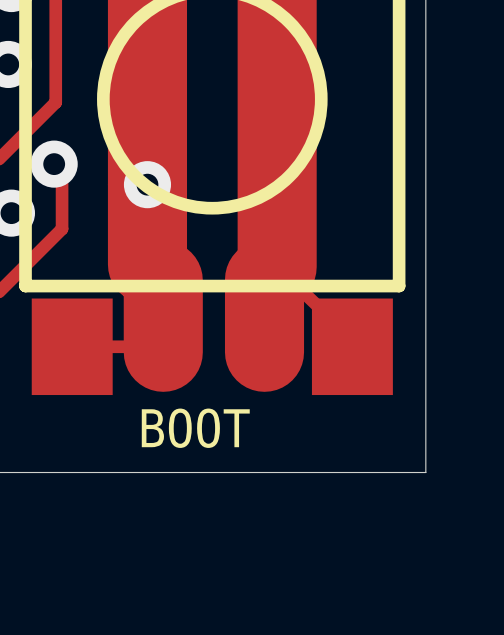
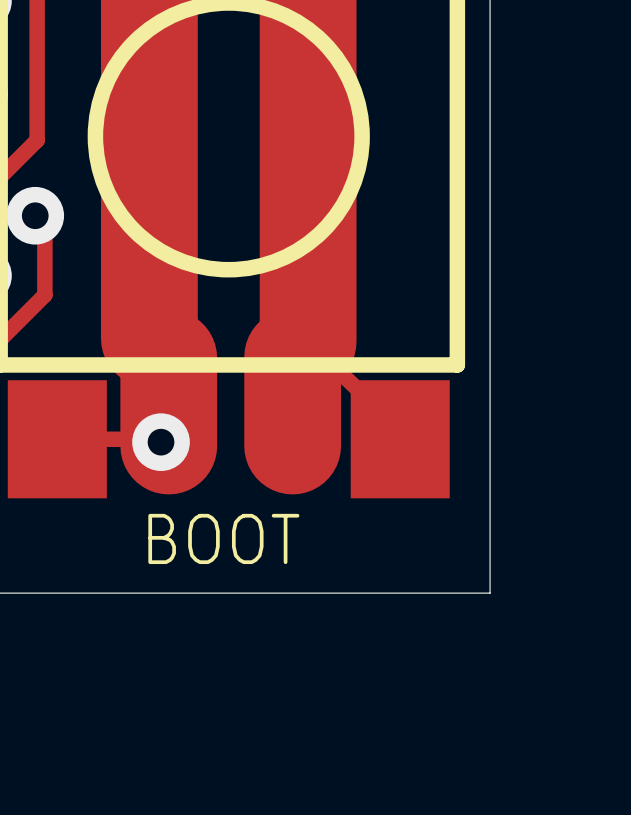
via position: (147, 184) -> (161, 442)

